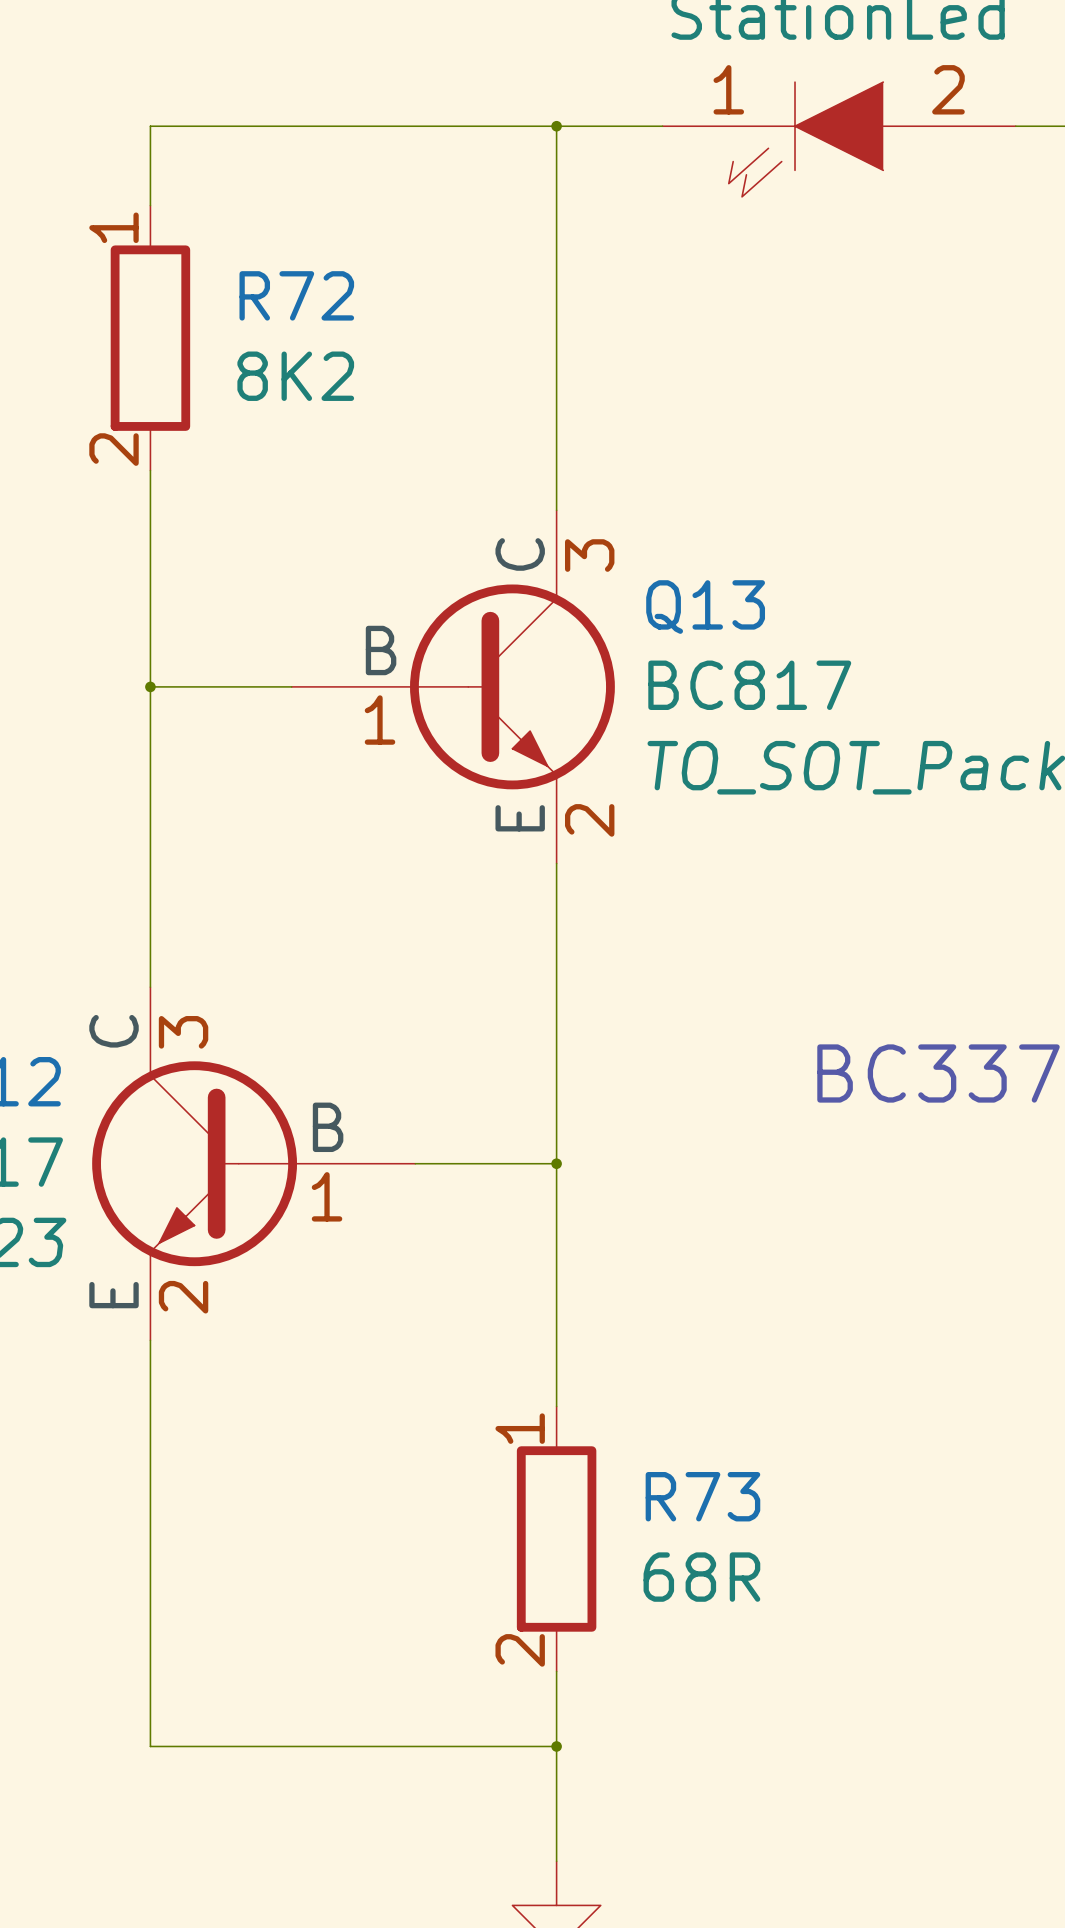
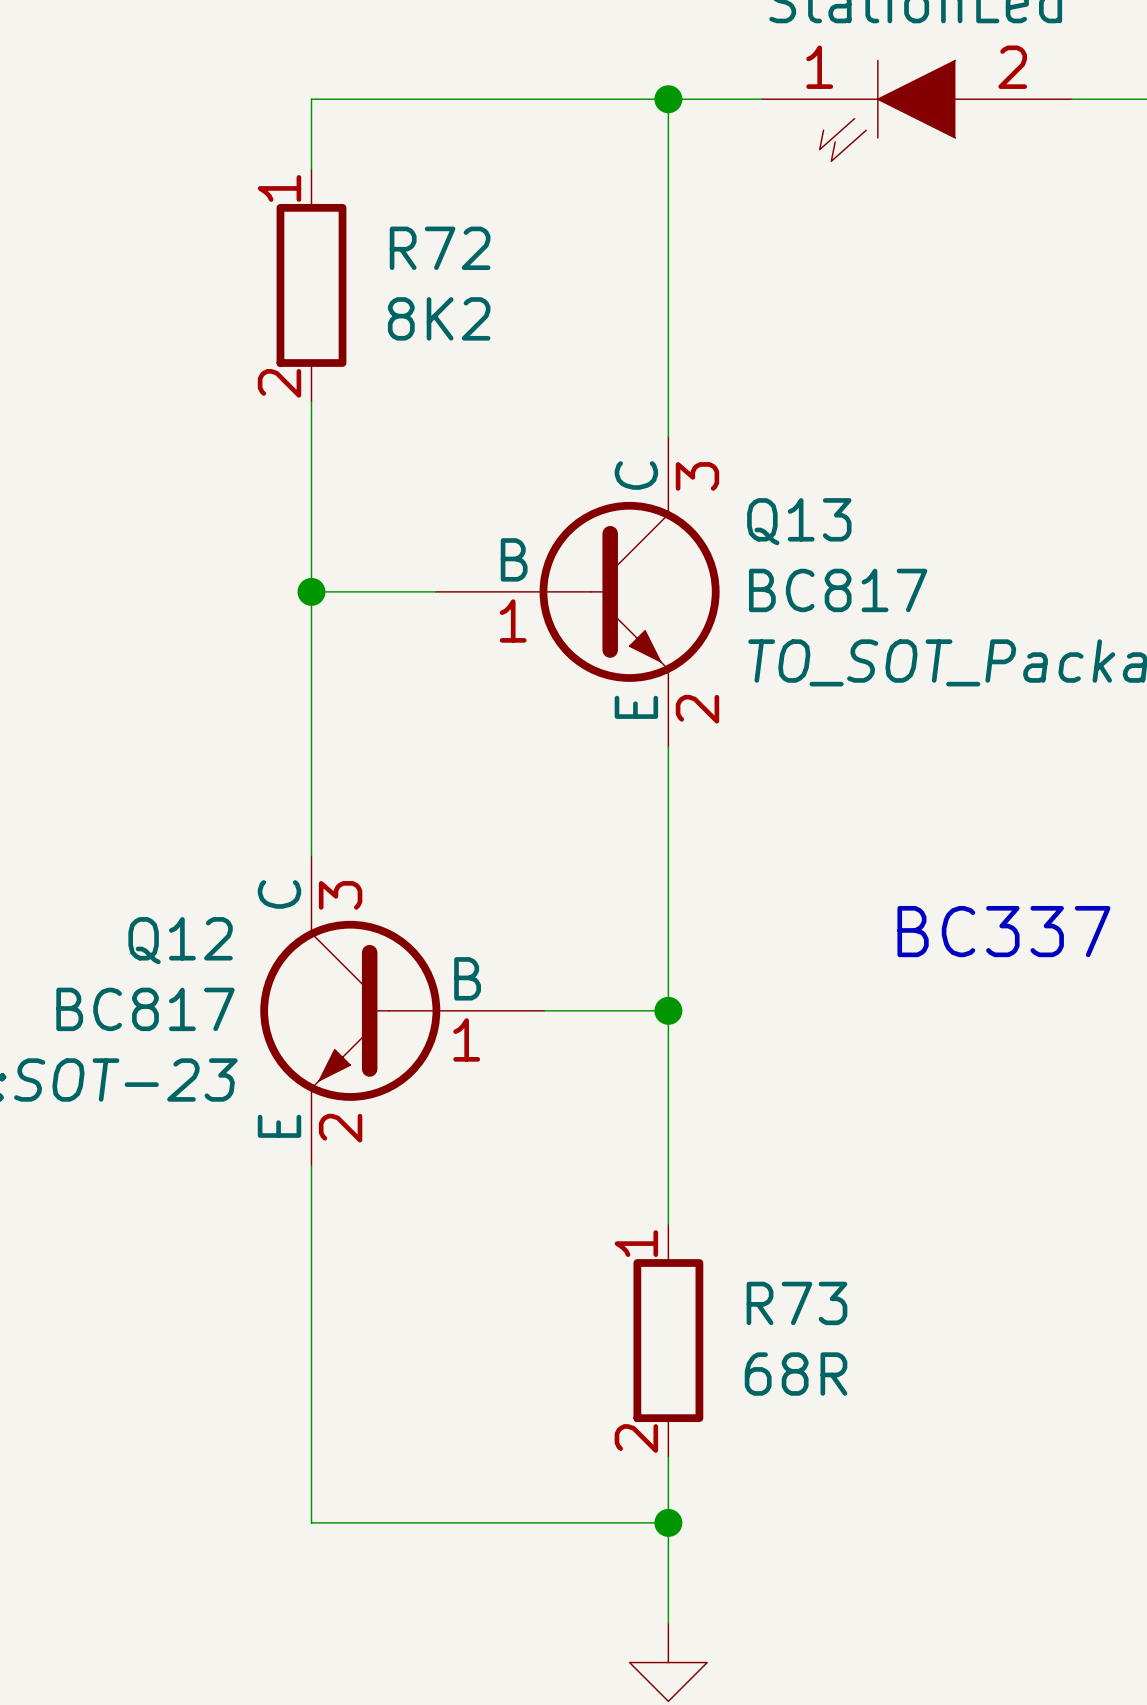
junction size: [551, 120, 562, 132] -> [654, 85, 683, 114]
junction size: [145, 681, 156, 693] -> [297, 577, 326, 606]
junction size: [551, 1158, 562, 1170] -> [654, 996, 683, 1025]
junction size: [551, 1741, 562, 1752] -> [654, 1508, 683, 1537]

